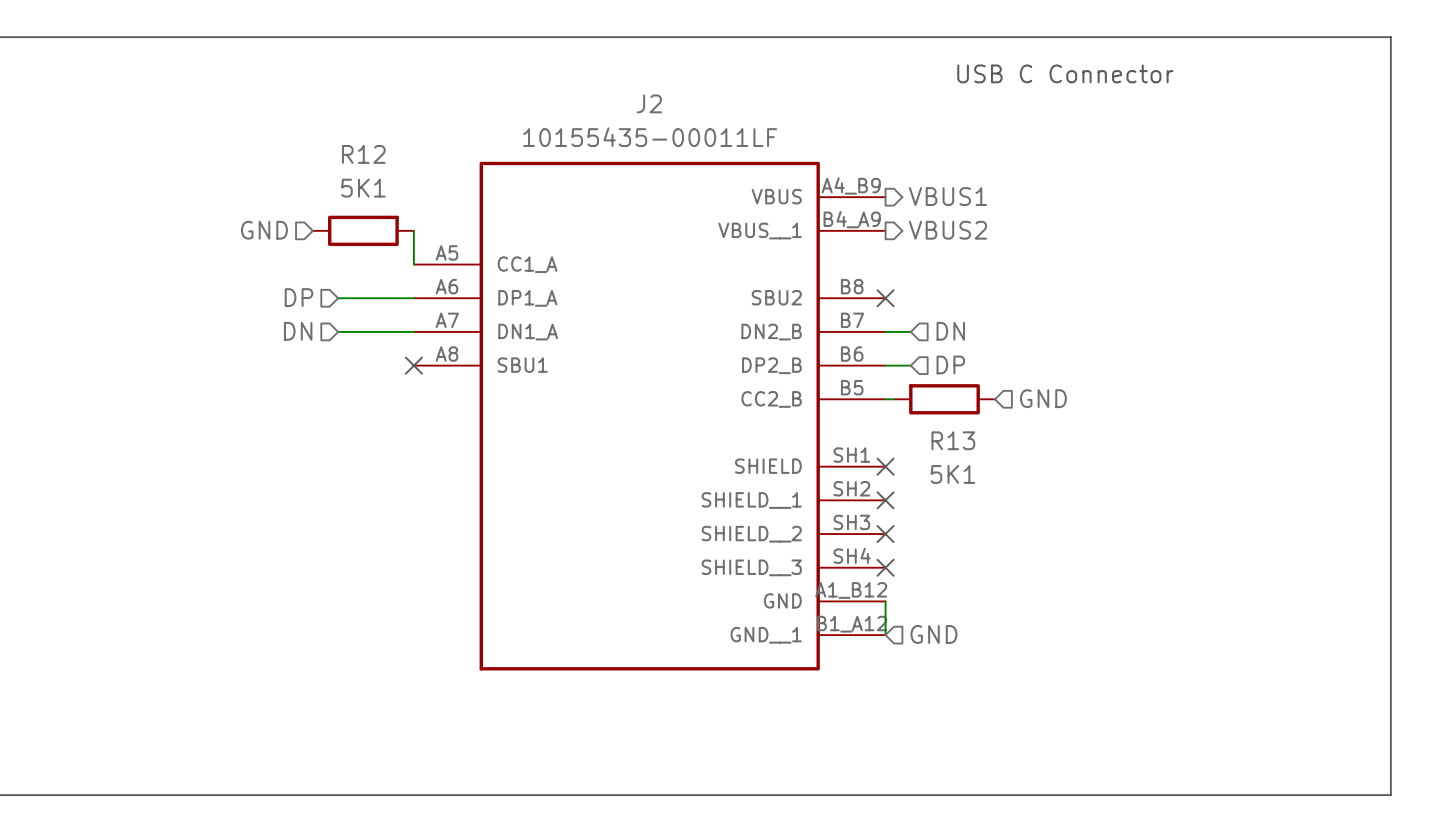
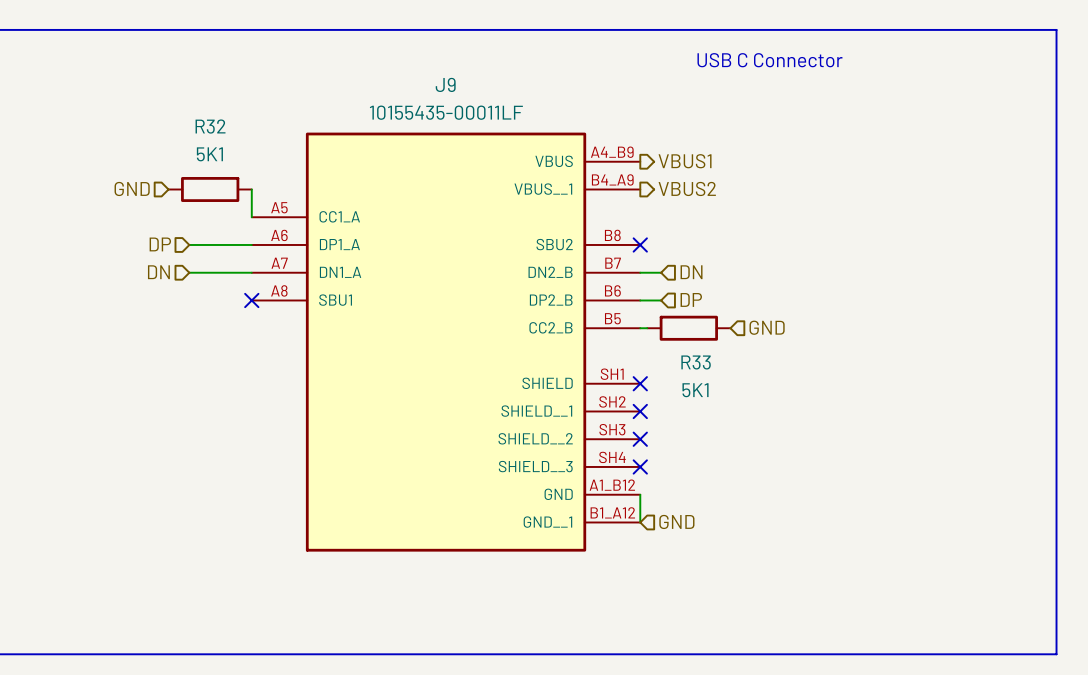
J2 name: J2 (649, 103) -> J9 (445, 84)
R12 name: R12 (363, 154) -> R32 (210, 126)
R13 name: R13 (953, 440) -> R33 (696, 362)

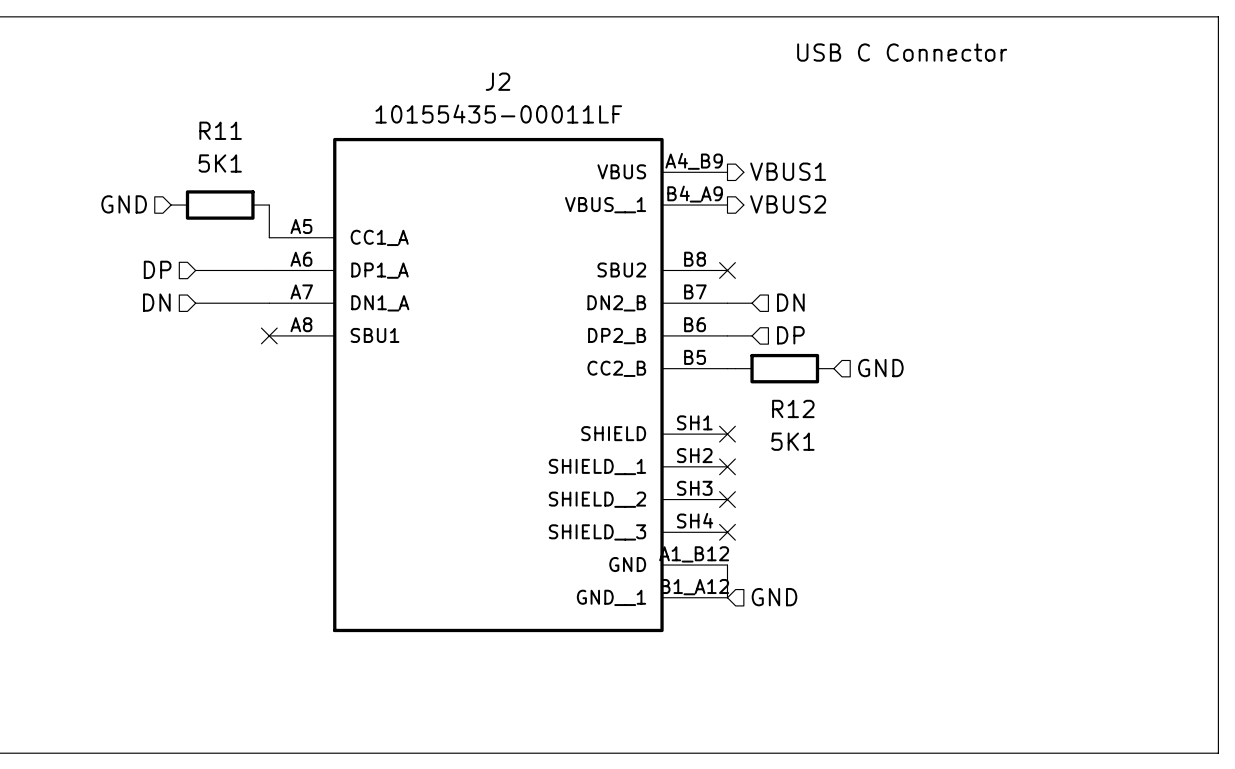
J9 name: J9 (445, 84) -> J2 (498, 81)
R32 name: R32 (210, 126) -> R11 (220, 130)
R33 name: R33 (696, 362) -> R12 (793, 408)

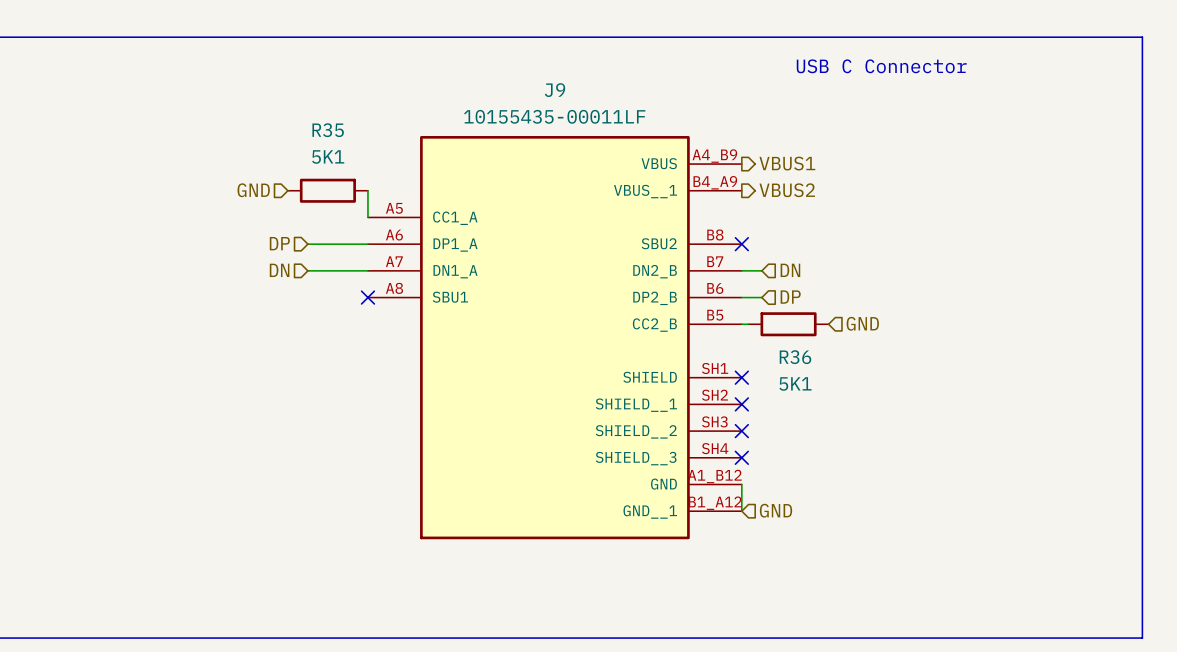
J2 name: J2 (498, 81) -> J9 (555, 90)
R11 name: R11 (220, 130) -> R35 (328, 130)
R12 name: R12 (793, 408) -> R36 (795, 357)

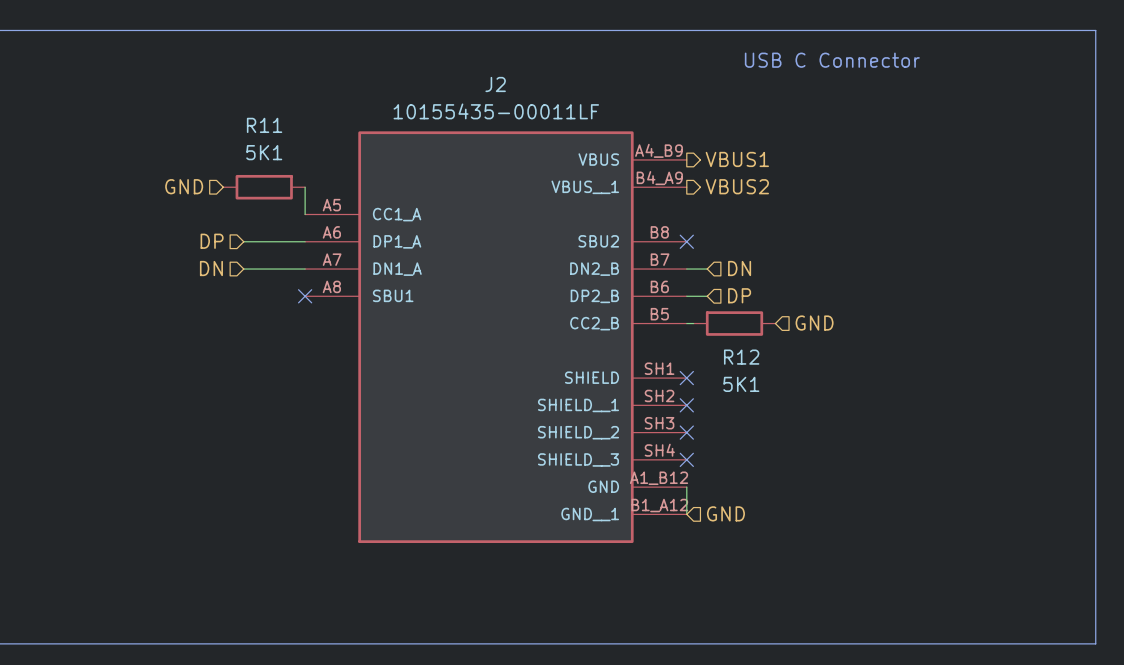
J9 name: J9 (555, 90) -> J2 (495, 84)
R35 name: R35 (328, 130) -> R11 (264, 125)
R36 name: R36 (795, 357) -> R12 (741, 357)

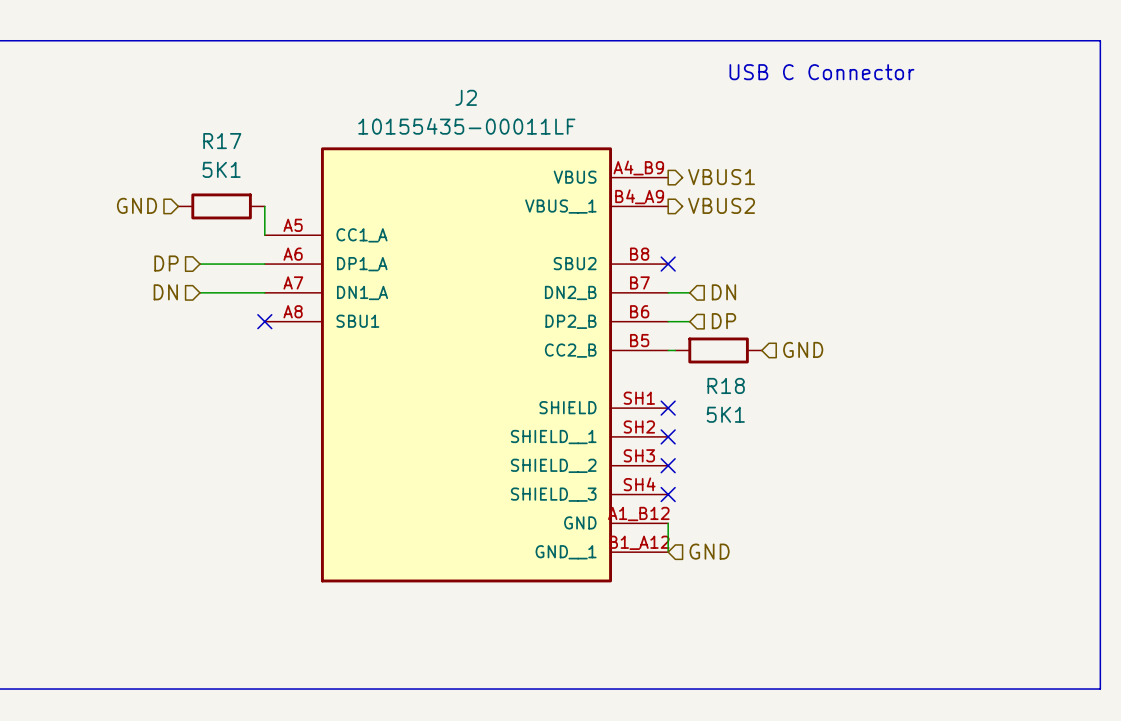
R11 name: R11 (264, 125) -> R17 (222, 141)
R12 name: R12 (741, 357) -> R18 (726, 385)

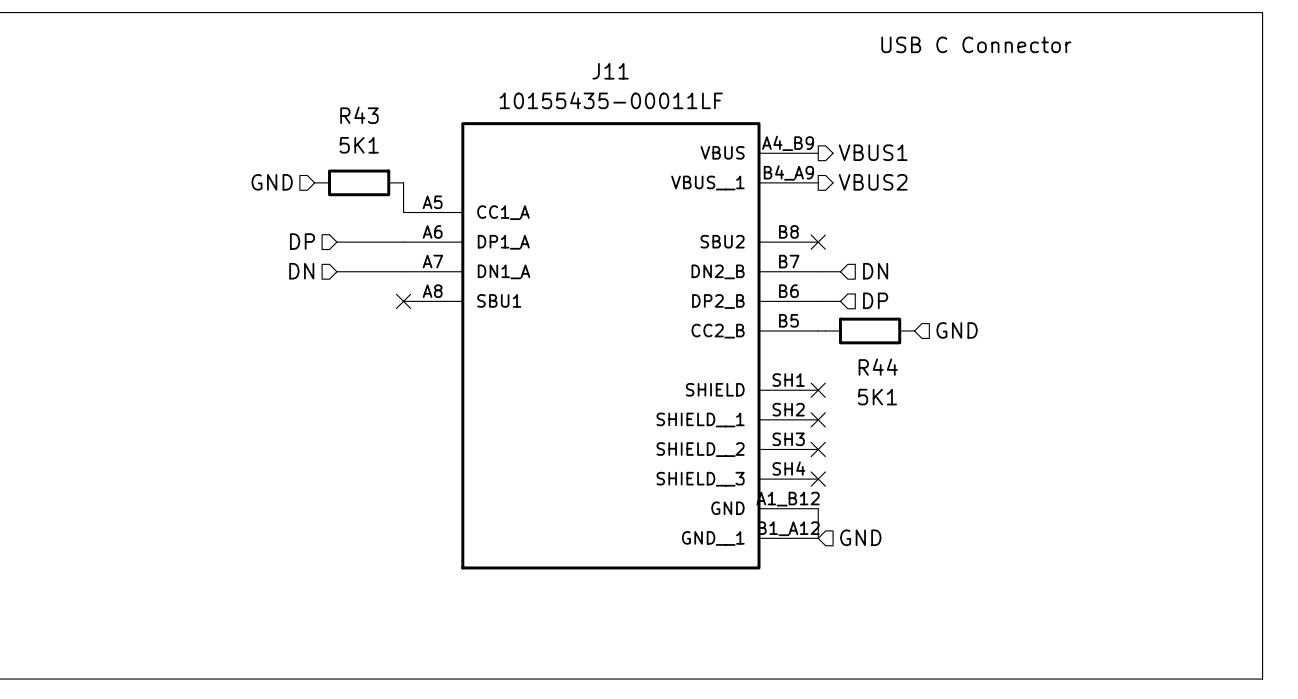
J2 name: J2 (466, 97) -> J11 (610, 71)
R17 name: R17 (222, 141) -> R43 (359, 115)
R18 name: R18 (726, 385) -> R44 (878, 367)

